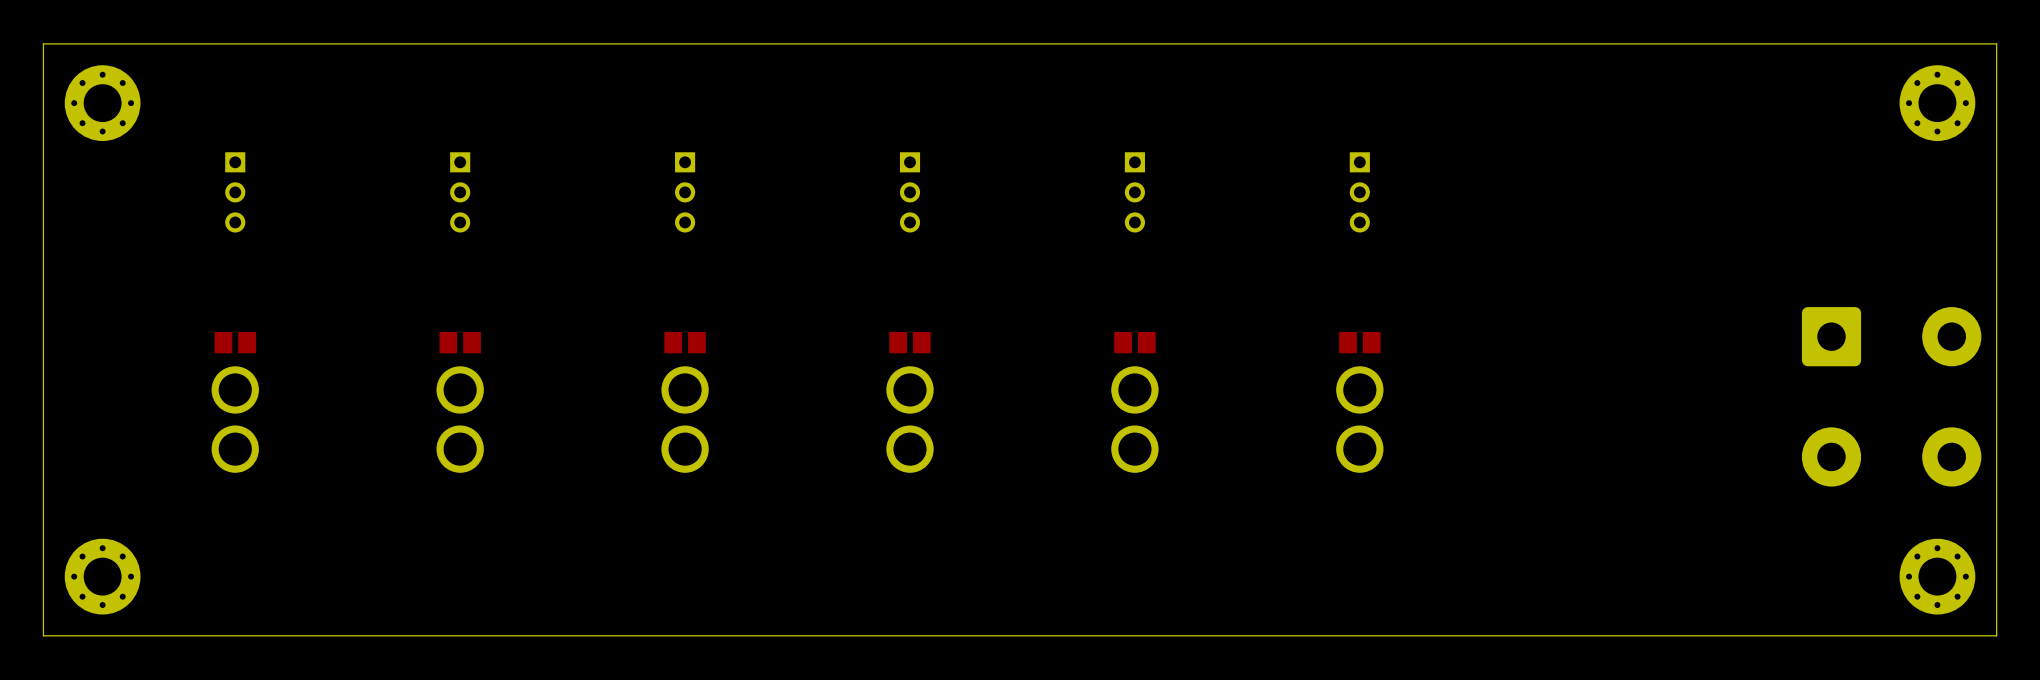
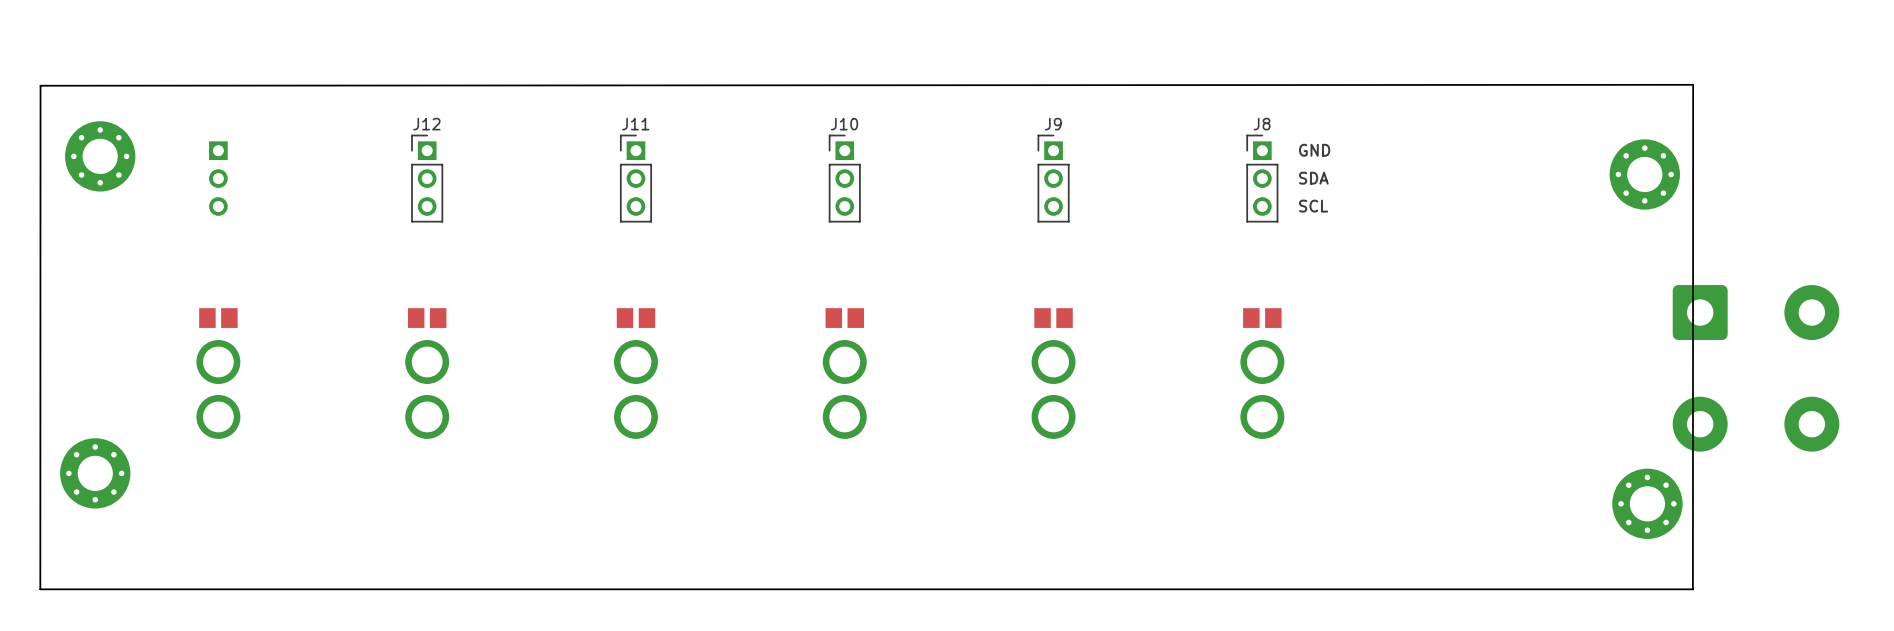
board edge: (1996, 43) (43, 43) (43, 635) (1996, 635) (1996, 43) -> (1693, 84) (1692, 589) (40, 589) (40, 85) (1693, 84)
part position: (102, 103) -> (100, 156)
part position: (1937, 103) -> (1644, 174)
text: none -> GND (1314, 150)
text: none -> SDA (1313, 178)
J12 side: top (460, 192) -> bottom (427, 178)
J11 side: top (685, 192) -> bottom (635, 178)
J10 side: top (910, 192) -> bottom (844, 178)
J9 side: top (1134, 192) -> bottom (1053, 178)
J8 side: top (1359, 192) -> bottom (1262, 178)
text: none -> SCL (1313, 206)
part position: (102, 576) -> (95, 473)
part position: (1937, 576) -> (1647, 503)

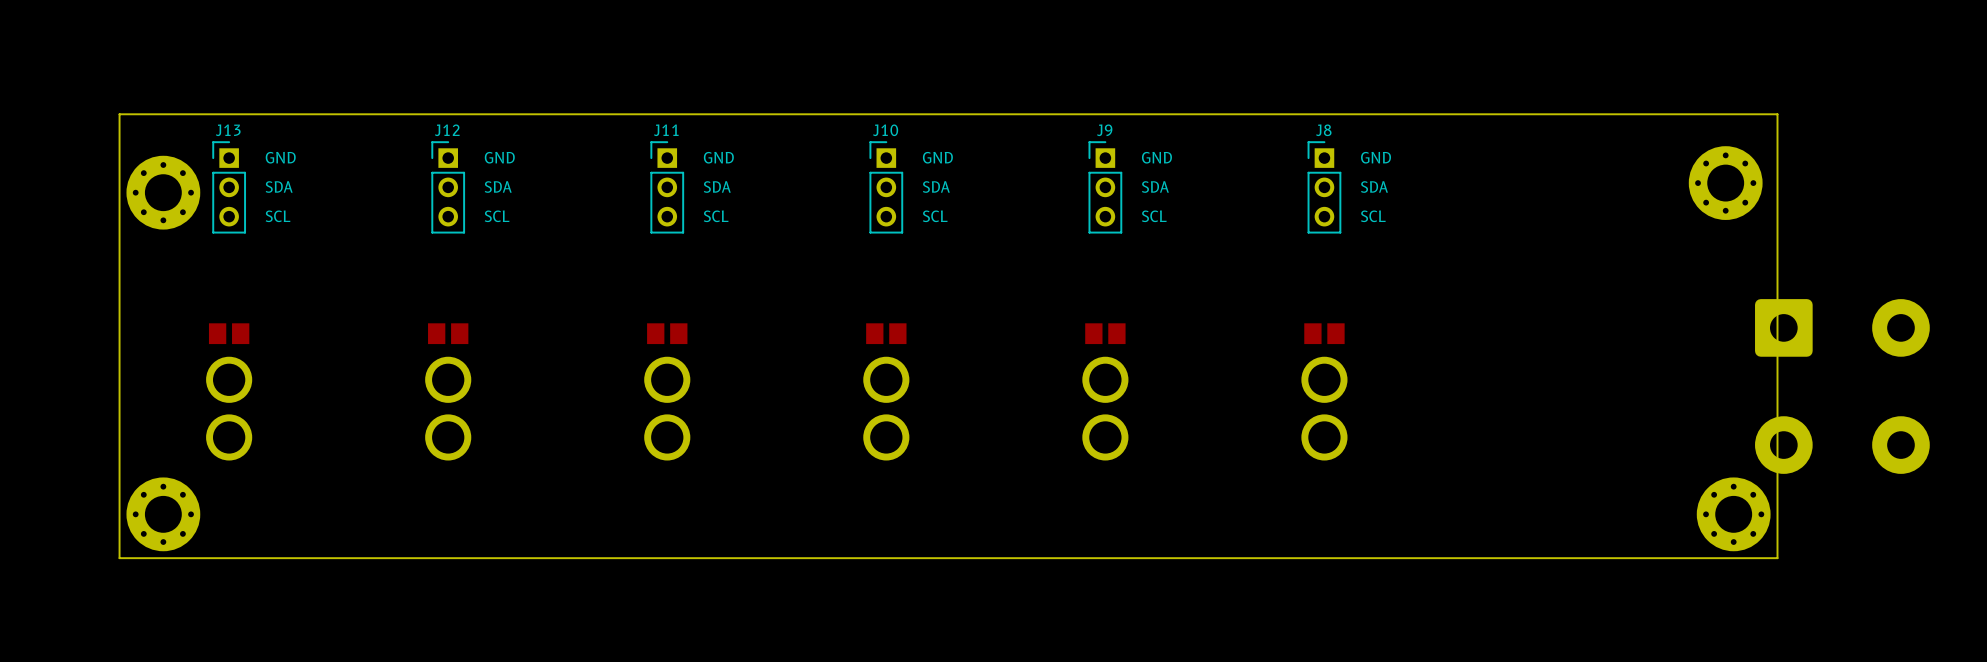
board edge: (1693, 84) (40, 85) (40, 589) (1692, 589) (1693, 84) -> (1777, 114) (1777, 558) (119, 558) (119, 114) (1777, 114)
text: none -> GND (280, 157)
text: none -> GND (499, 157)
text: none -> GND (718, 157)
text: none -> GND (937, 157)
text: none -> GND (1156, 157)
part position: (100, 156) -> (163, 192)
J13 side: top (218, 178) -> bottom (229, 187)
text: none -> SDA (279, 187)
text: none -> SDA (498, 187)
text: none -> SDA (717, 187)
text: none -> SDA (936, 187)
text: none -> SDA (1155, 187)
text: none -> SCL (278, 216)
text: none -> SCL (497, 216)
text: none -> SCL (716, 216)
text: none -> SCL (935, 216)
text: none -> SCL (1154, 216)
part position: (95, 473) -> (163, 514)
part position: (1647, 503) -> (1733, 514)

